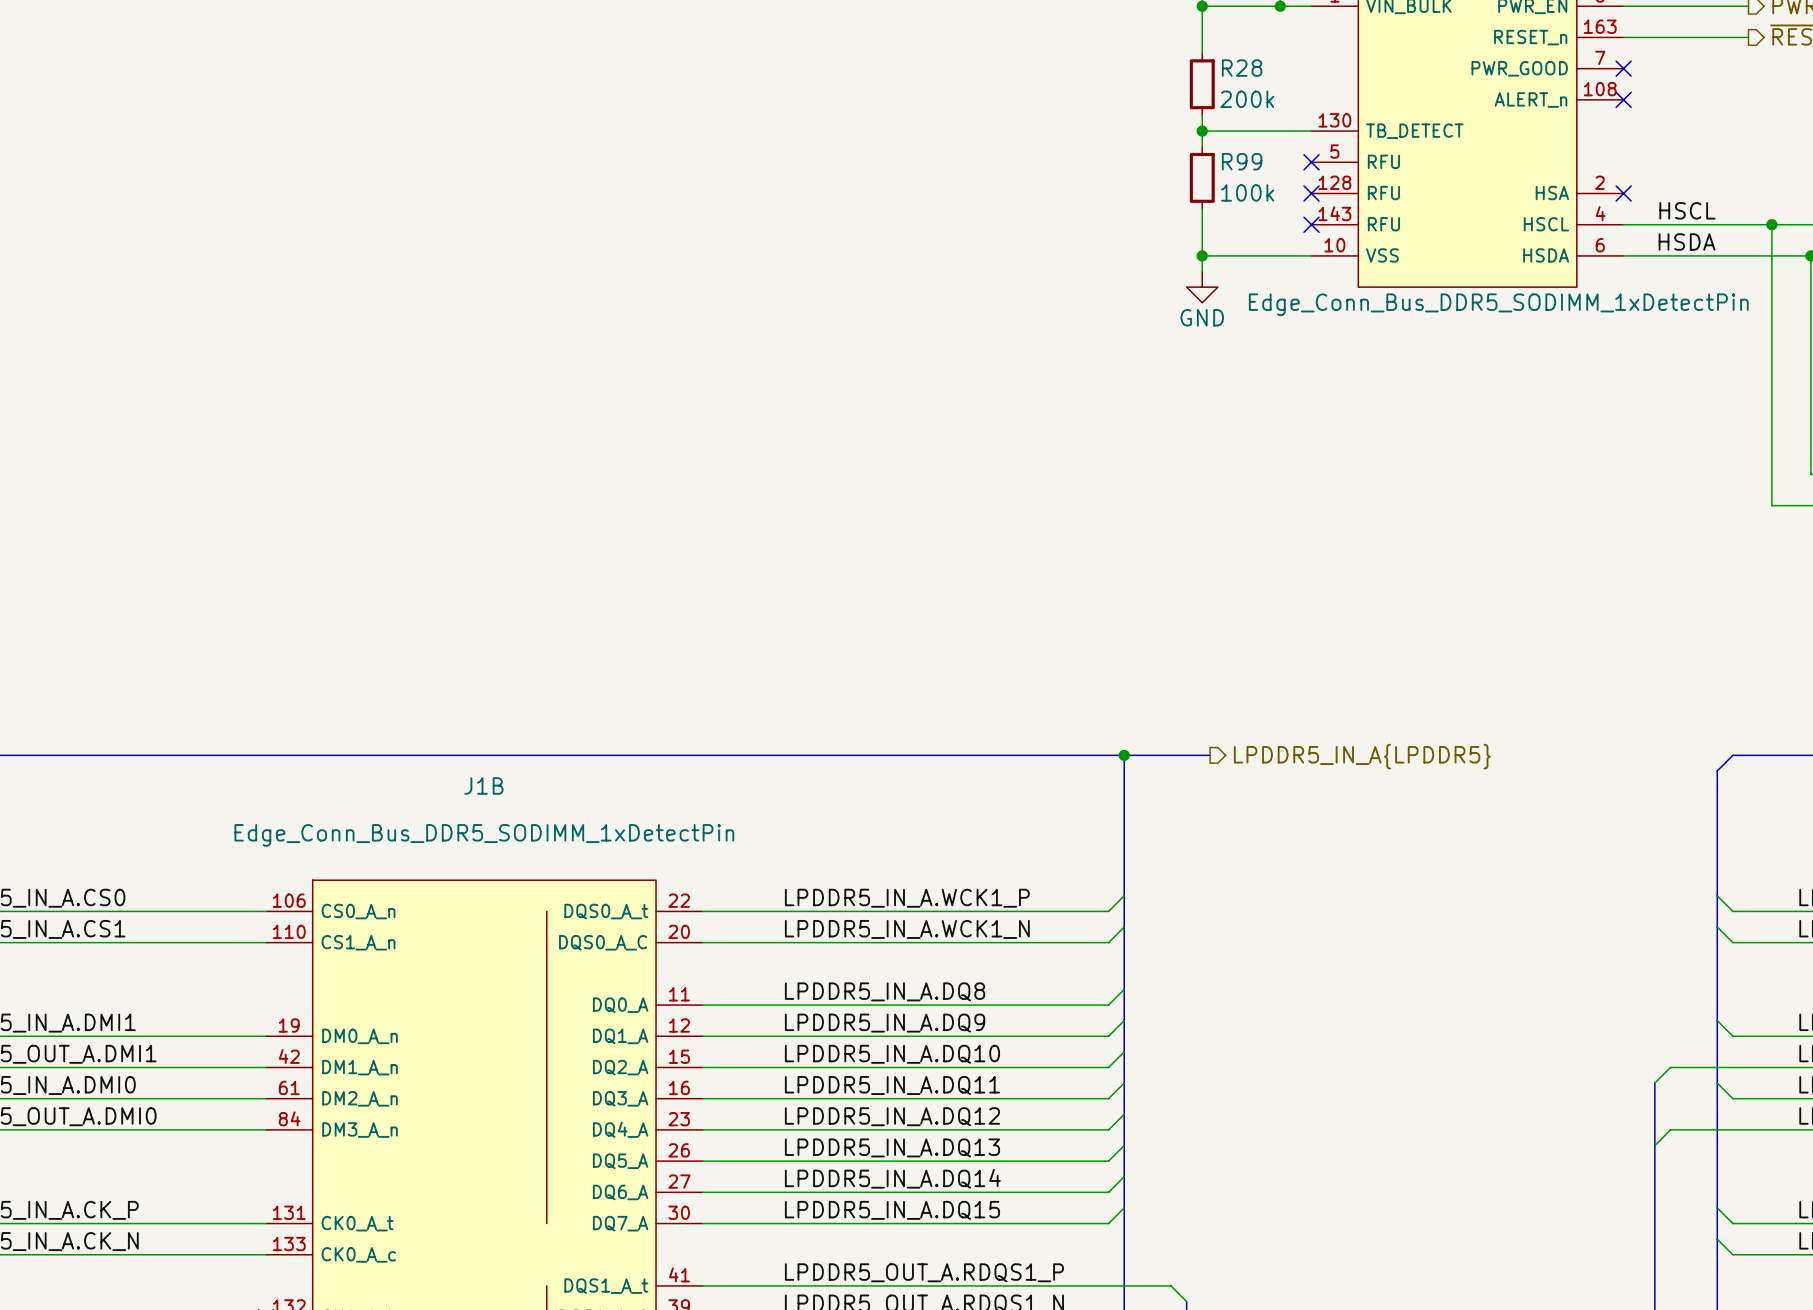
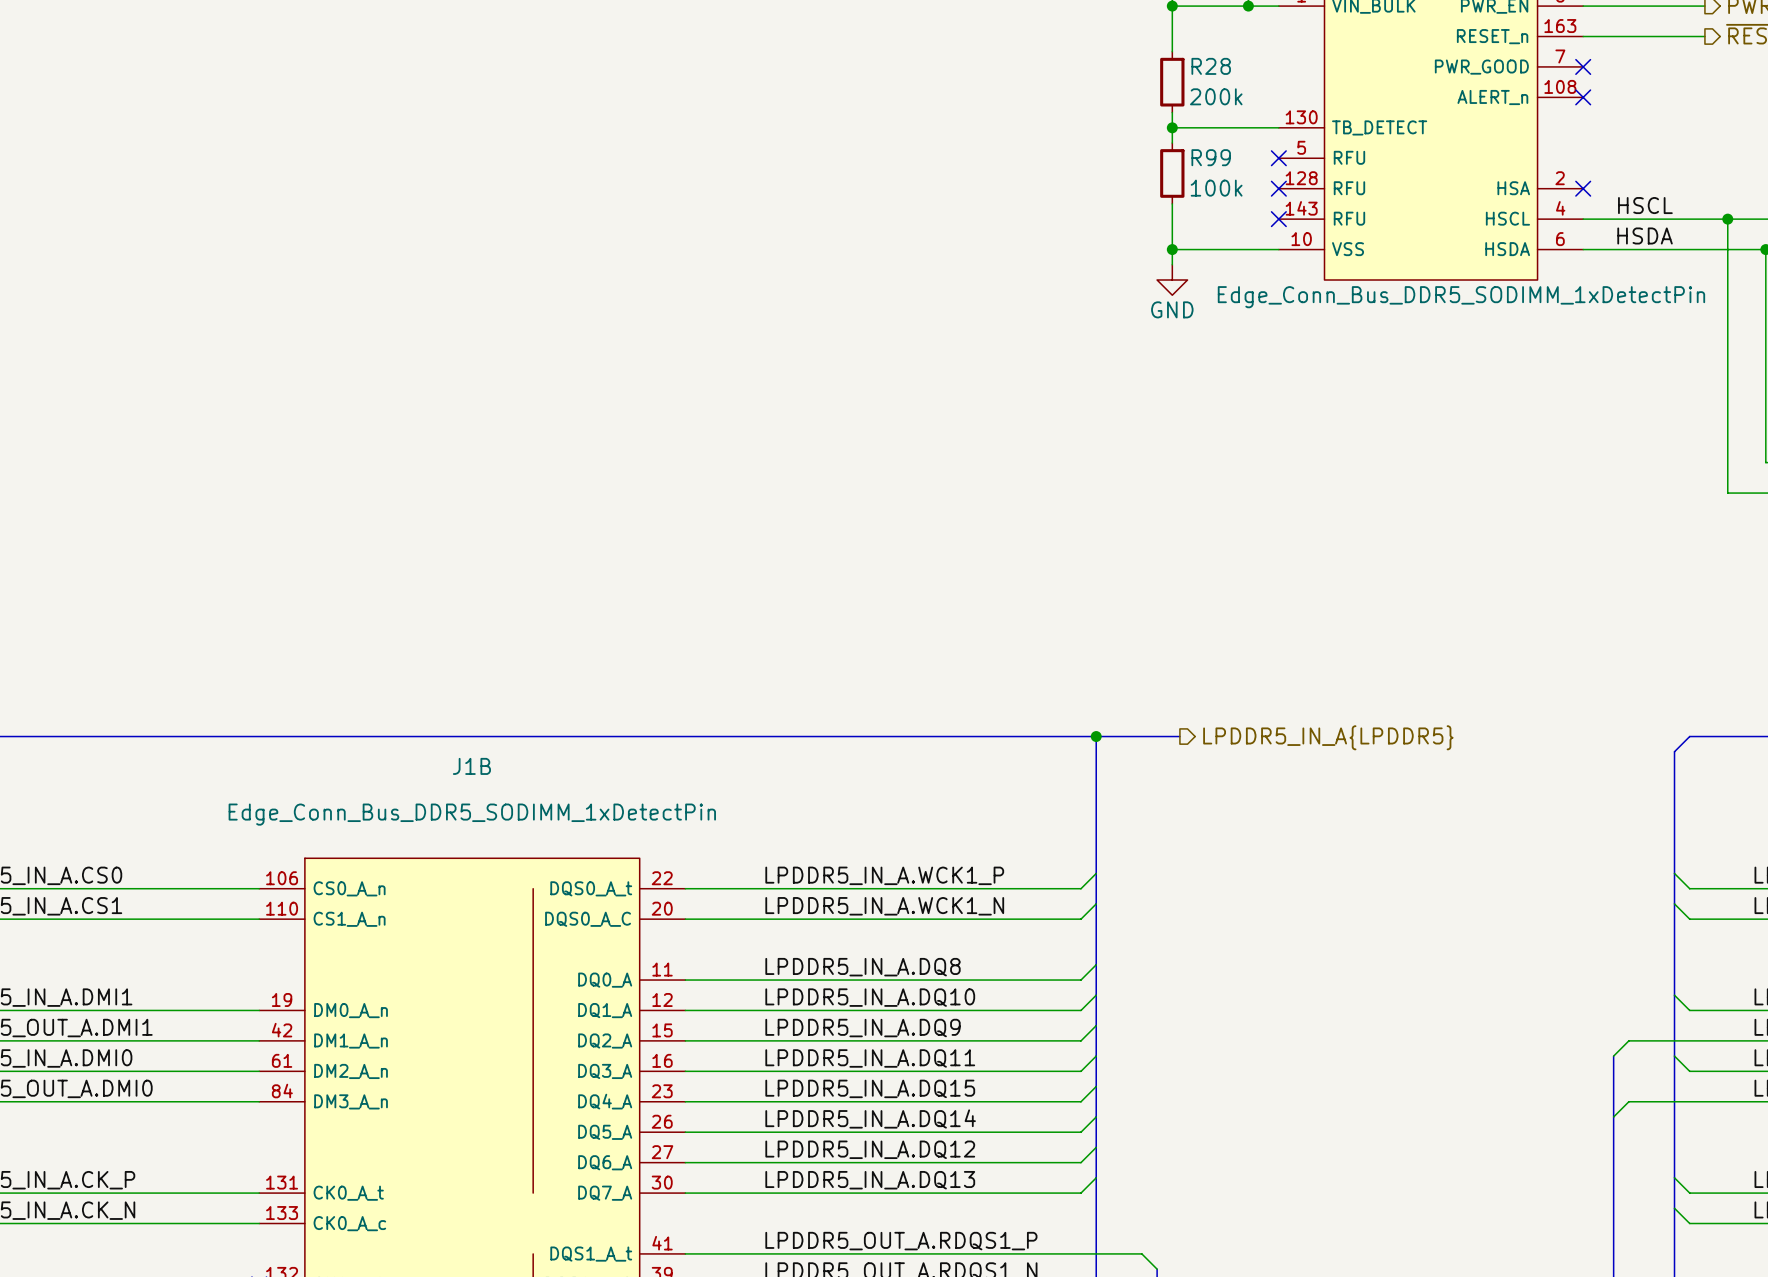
label: LPDDR5_IN_A.DQ9 (885, 1023) -> LPDDR5_IN_A.DQ10 (870, 997)
label: LPDDR5_IN_A.DQ10 (892, 1054) -> LPDDR5_IN_A.DQ9 (863, 1028)
label: LPDDR5_IN_A.DQ12 (892, 1116) -> LPDDR5_IN_A.DQ15 (870, 1088)
label: LPDDR5_IN_A.DQ13 (892, 1147) -> LPDDR5_IN_A.DQ14 (870, 1118)
label: LPDDR5_IN_A.DQ14 (892, 1178) -> LPDDR5_IN_A.DQ12 (870, 1149)
label: LPDDR5_IN_A.DQ15 (892, 1210) -> LPDDR5_IN_A.DQ13 (870, 1180)

